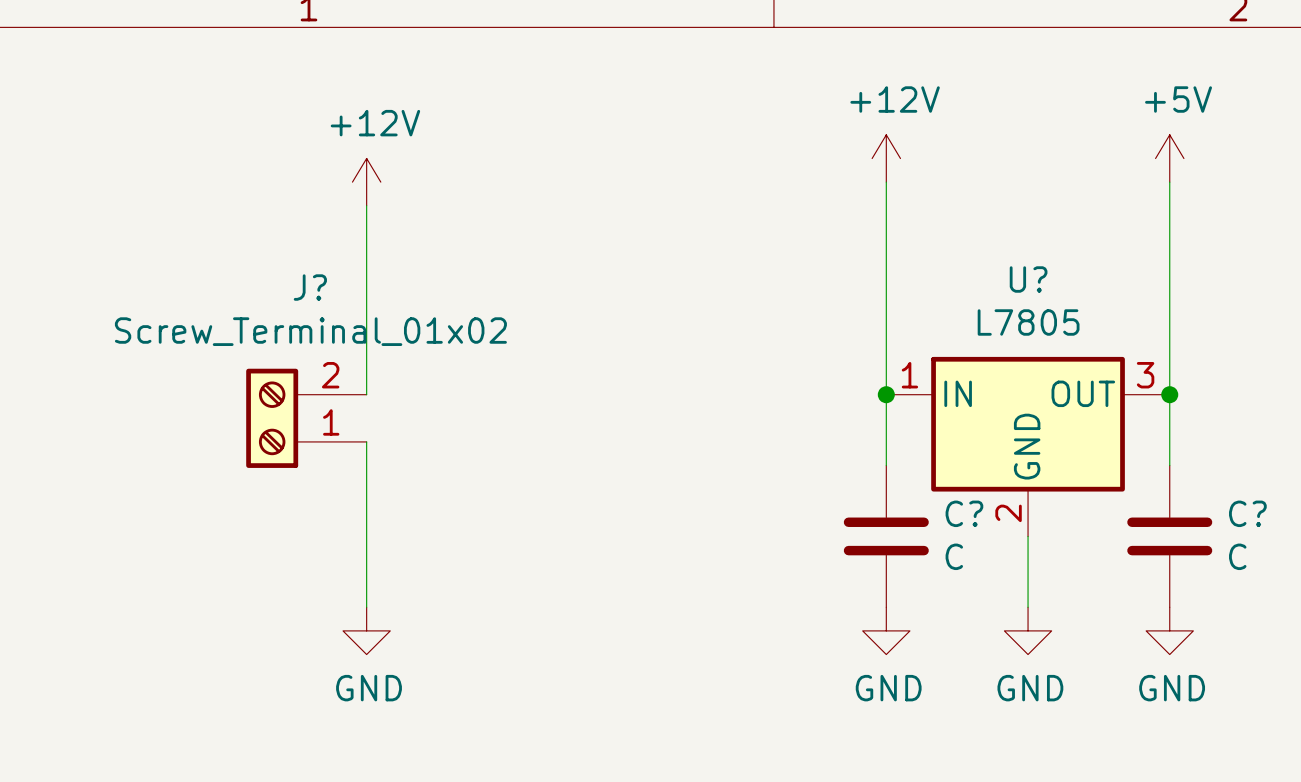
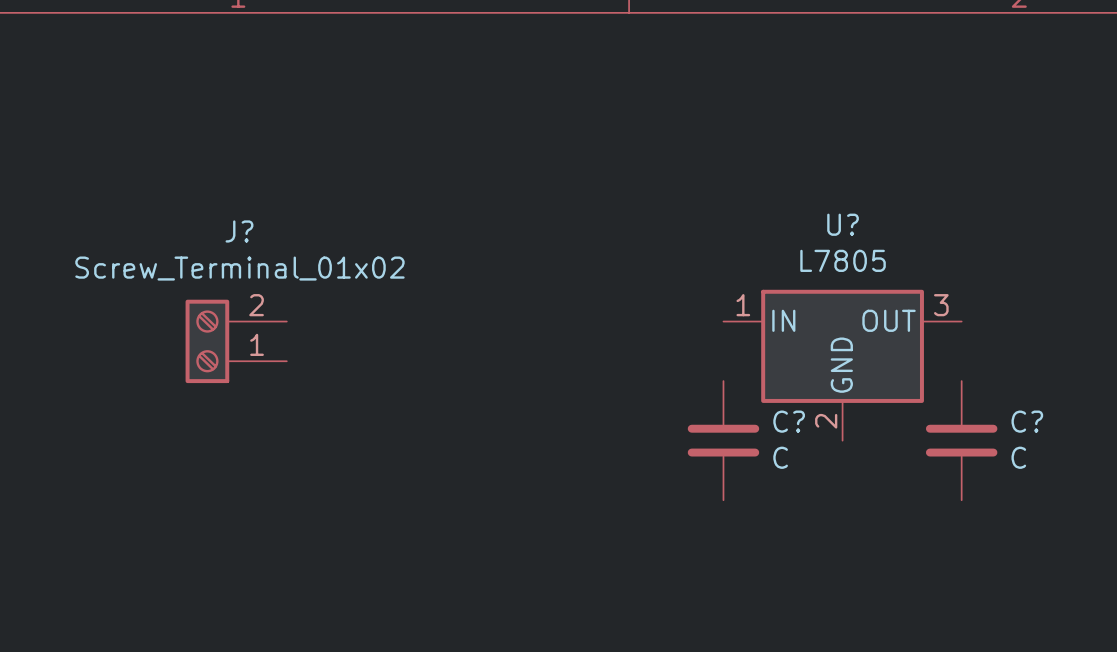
power symbol: +12V (886, 158) -> none
power symbol: +5V (1169, 158) -> none
power symbol: +12V (366, 182) -> none
wire: (886, 182) (886, 465) -> none
wire: (1169, 182) (1169, 465) -> none
wire: (366, 205) (366, 394) -> none
junction: (886, 394) -> none
junction: (1169, 394) -> none
wire: (366, 441) (366, 607) -> none
wire: (1028, 536) (1028, 607) -> none
power symbol: GND (366, 630) -> none
power symbol: GND (886, 630) -> none
power symbol: GND (1028, 630) -> none
power symbol: GND (1169, 630) -> none

